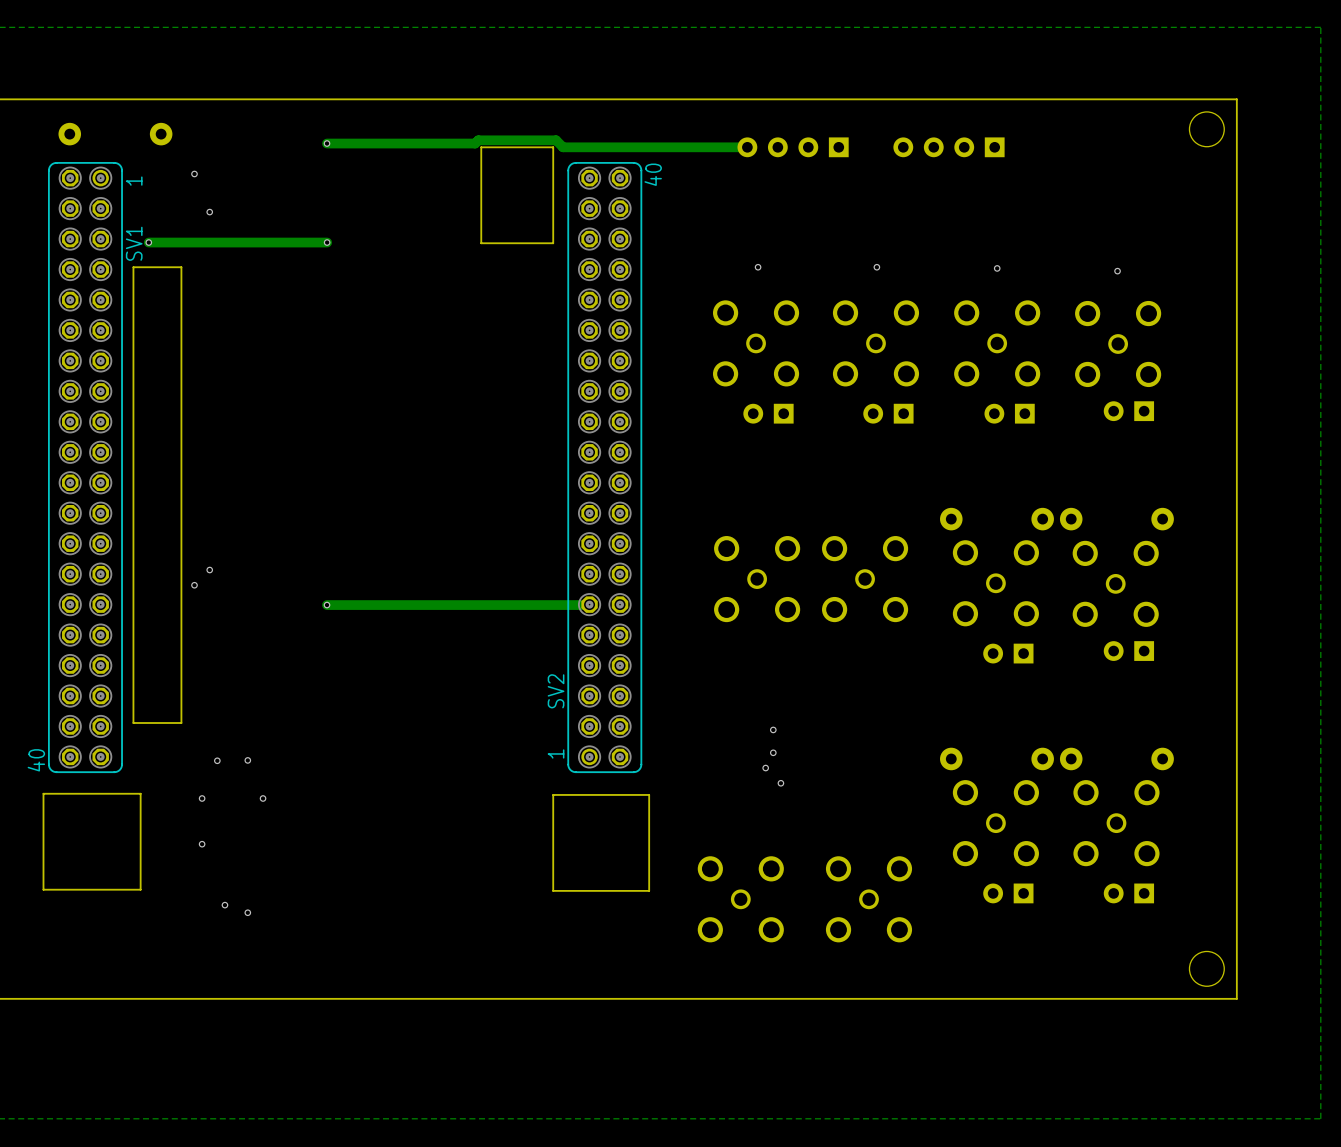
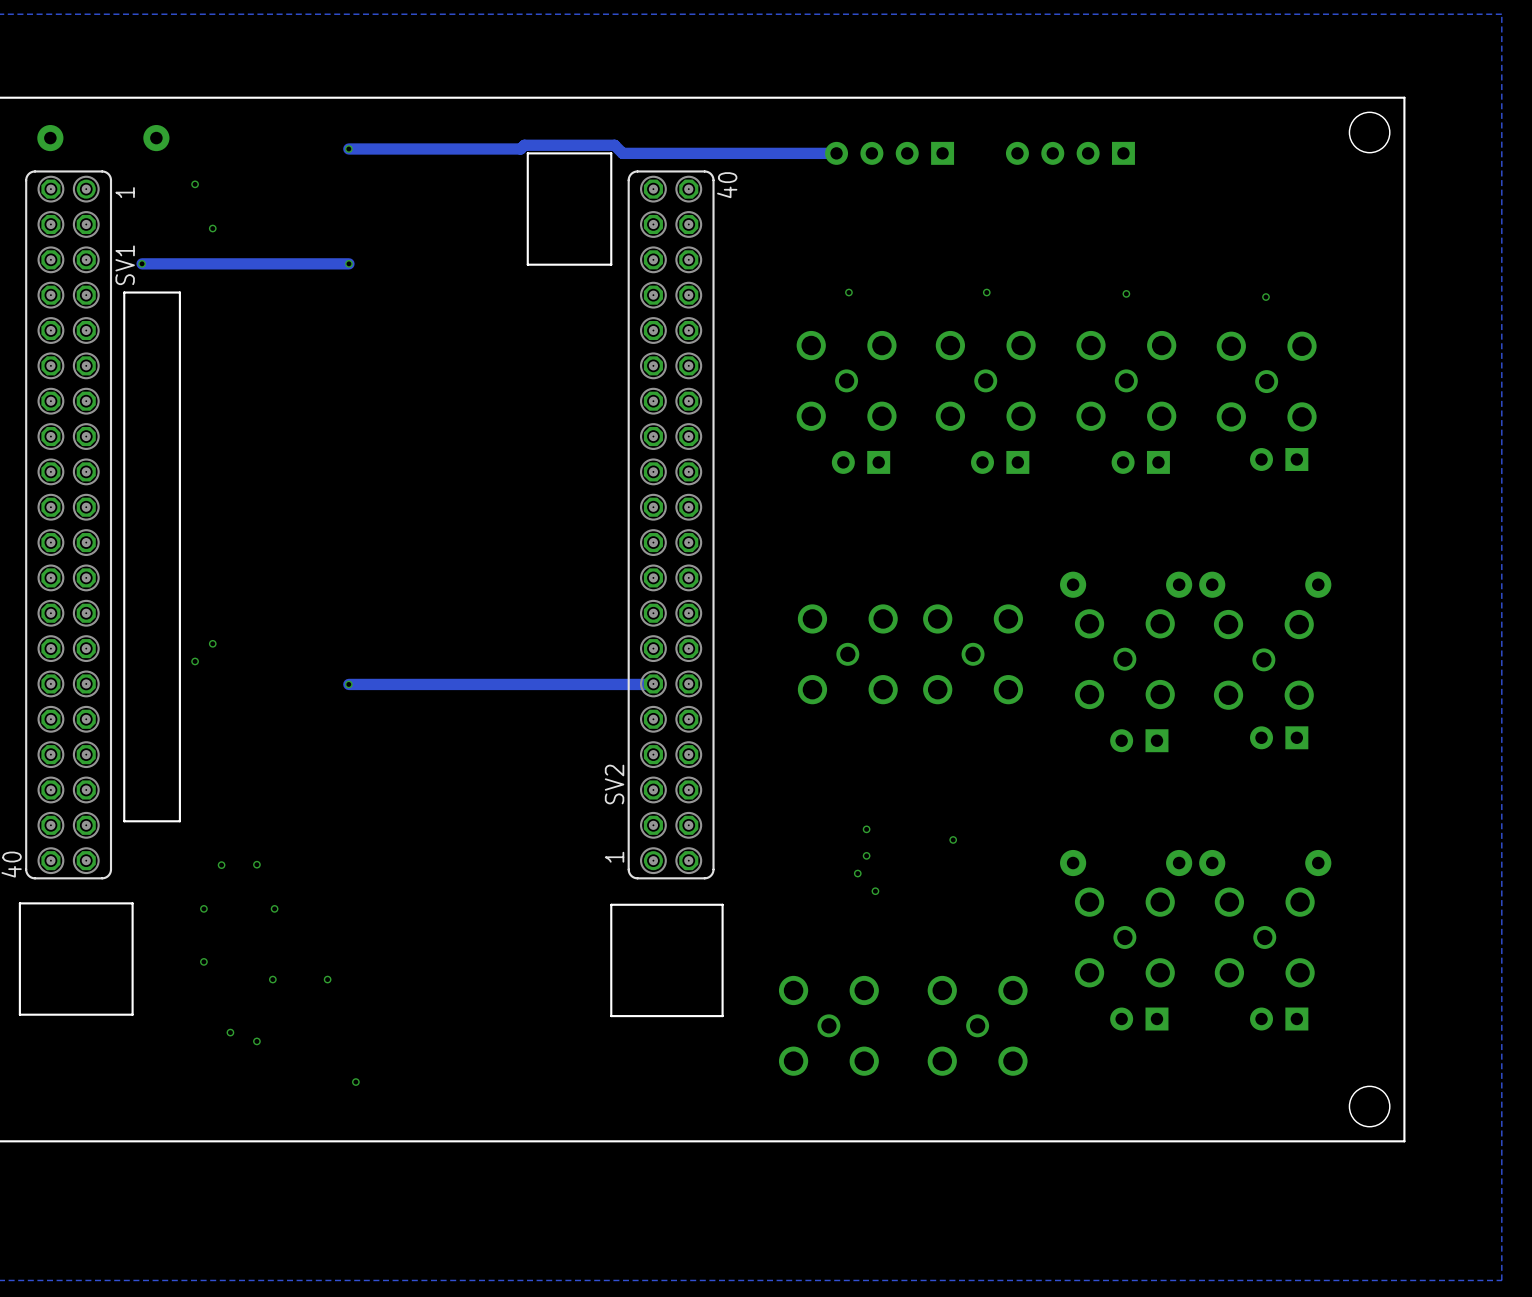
via: none -> (953, 839)
via: none -> (272, 979)
via: none -> (327, 979)
via: none -> (355, 1082)

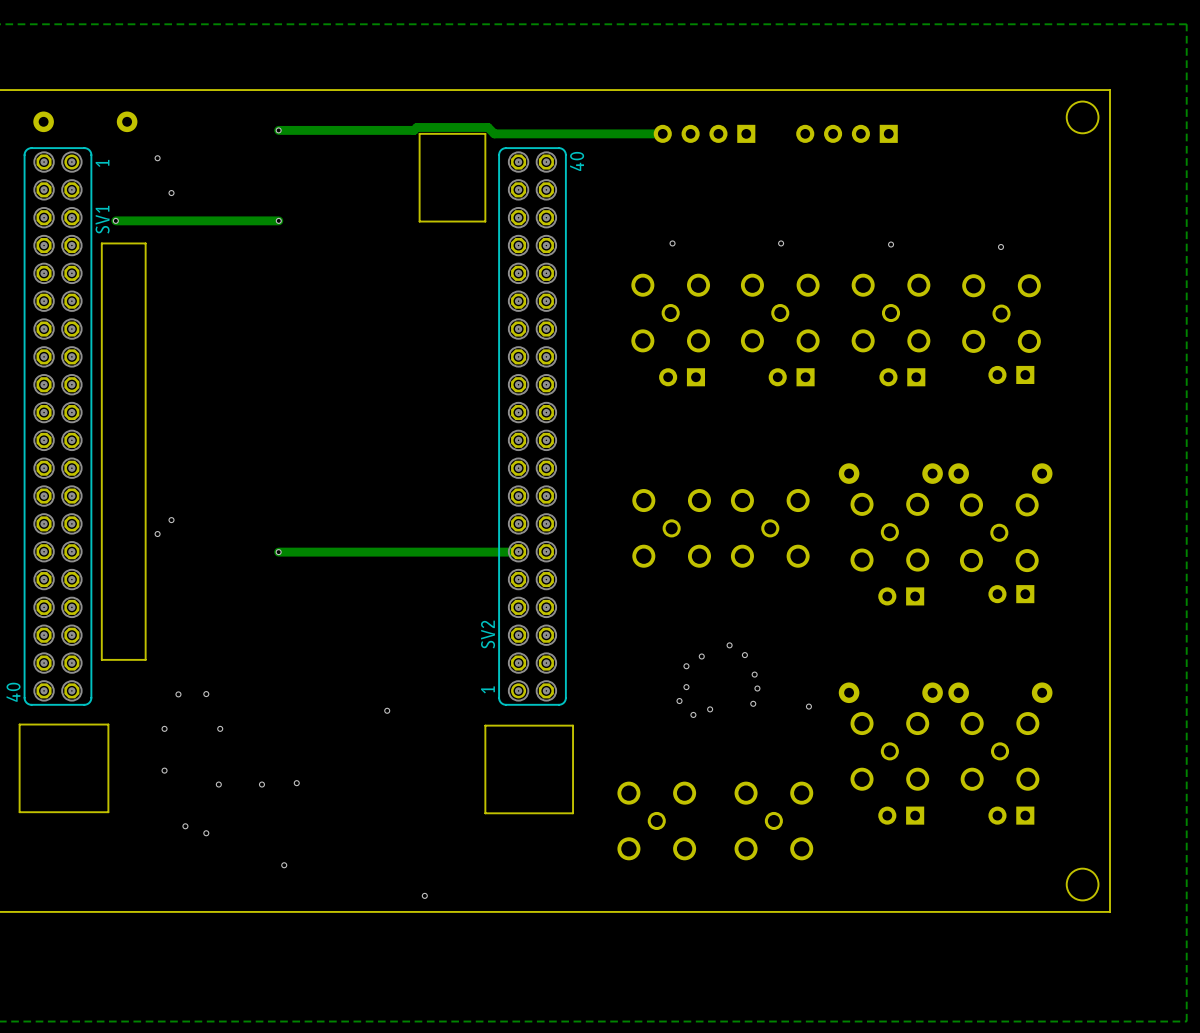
via: none -> (729, 645)
via: none -> (744, 655)
via: none -> (701, 656)
via: none -> (757, 688)
via: none -> (753, 703)
via: none -> (808, 706)
via: none -> (710, 709)
via: none -> (387, 710)
via: none -> (296, 783)
via: none -> (424, 895)

